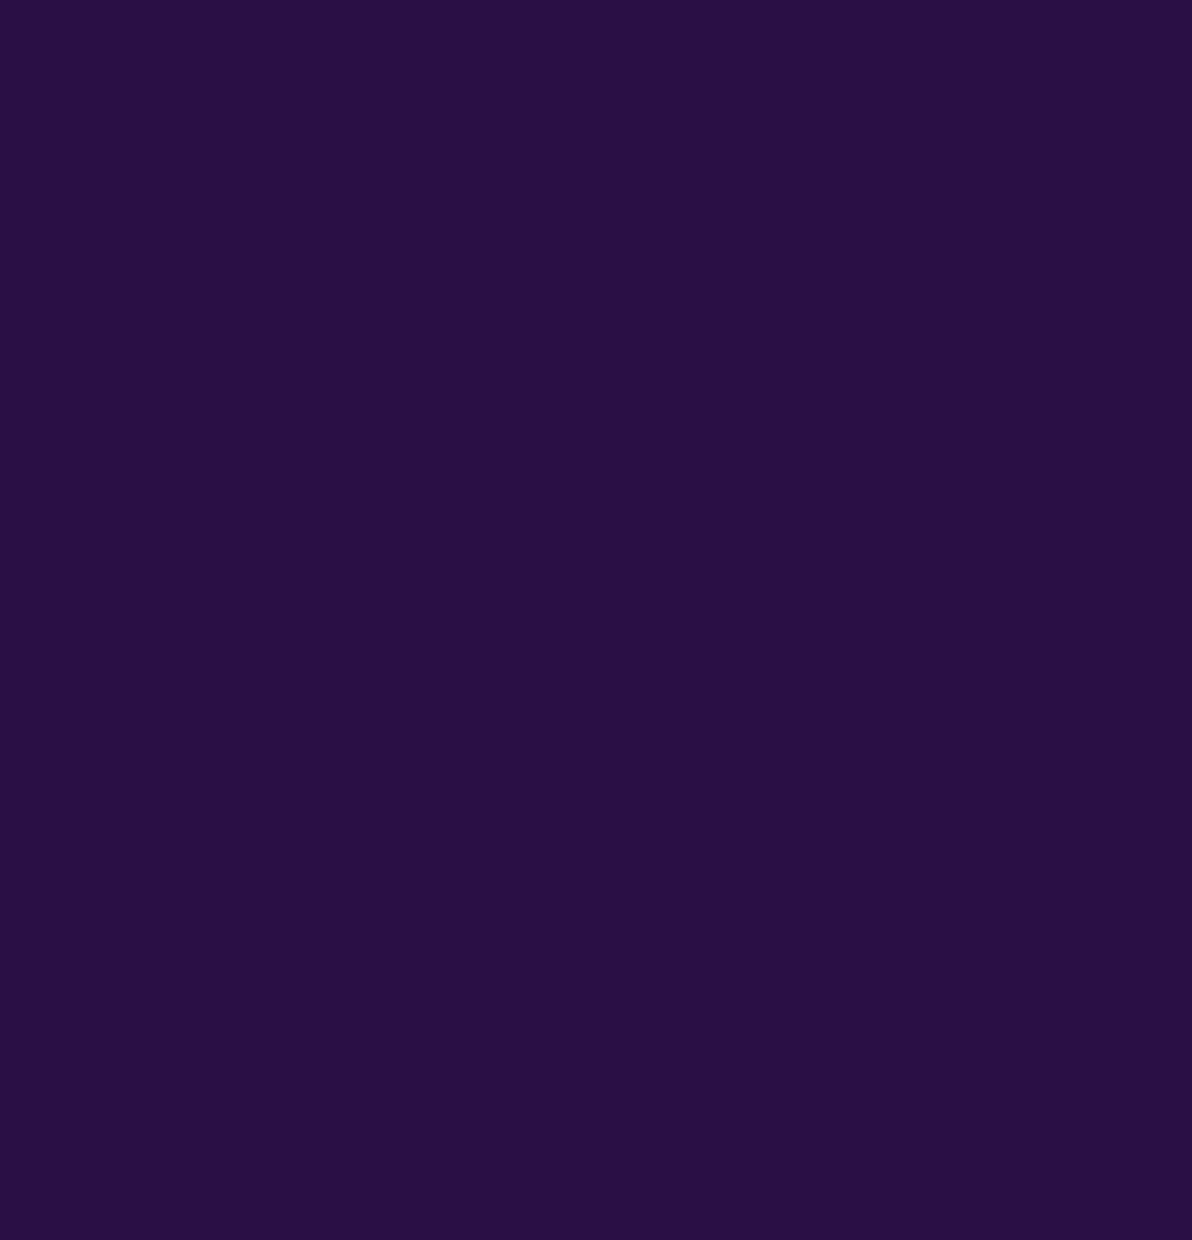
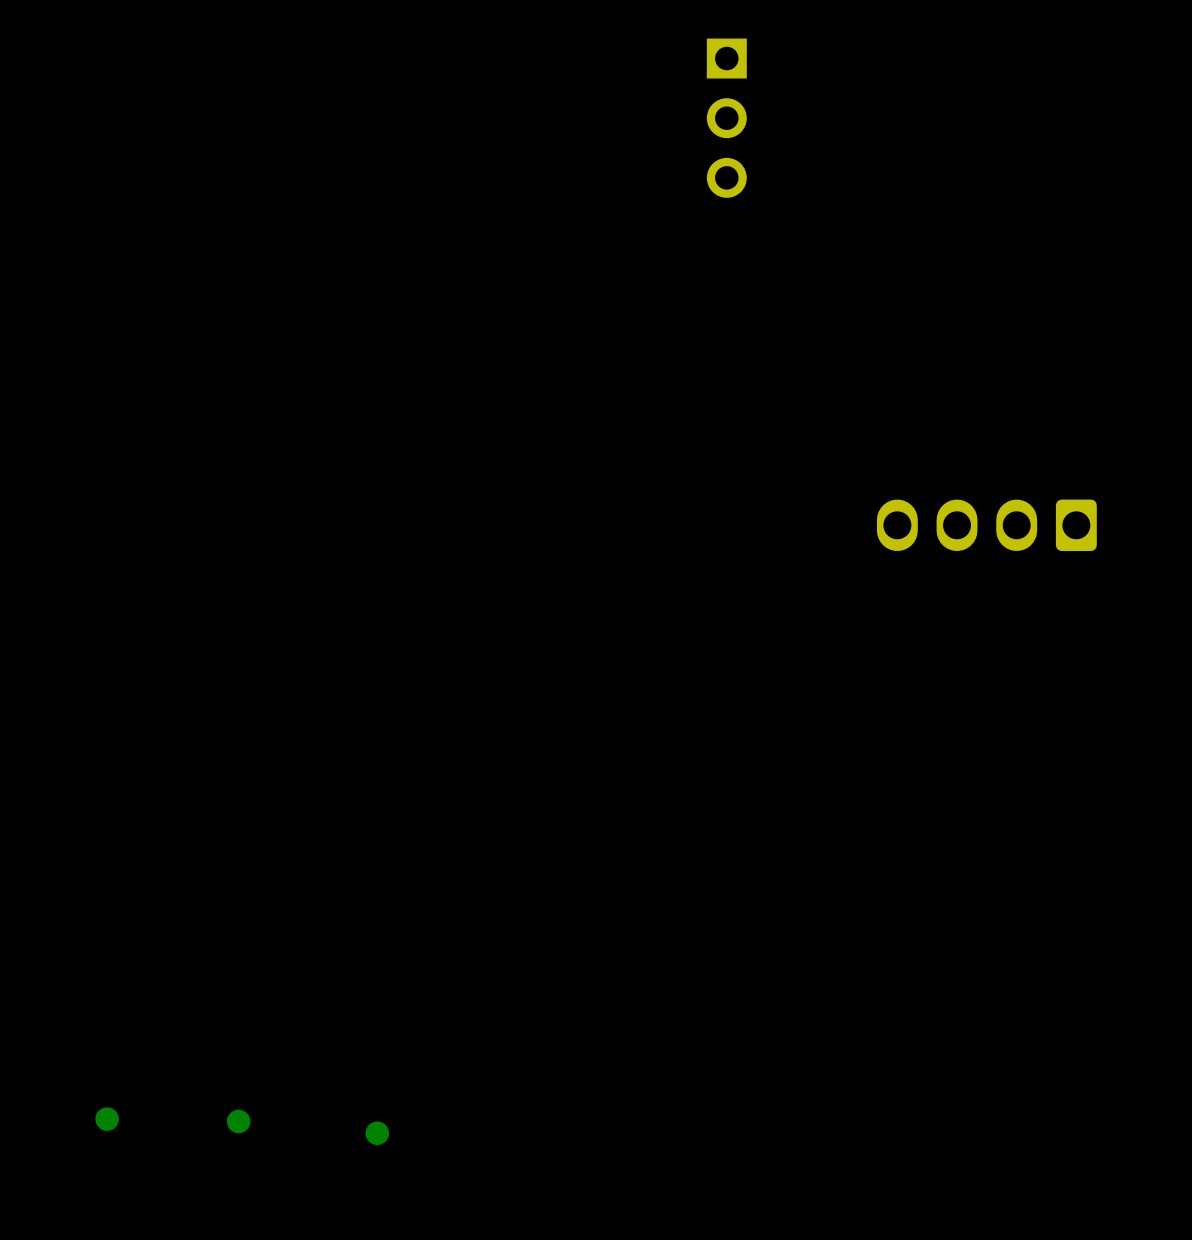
part: none -> (726, 118)
part: none -> (986, 525)
part: none -> (107, 1119)
part: none -> (238, 1121)
part: none -> (377, 1133)

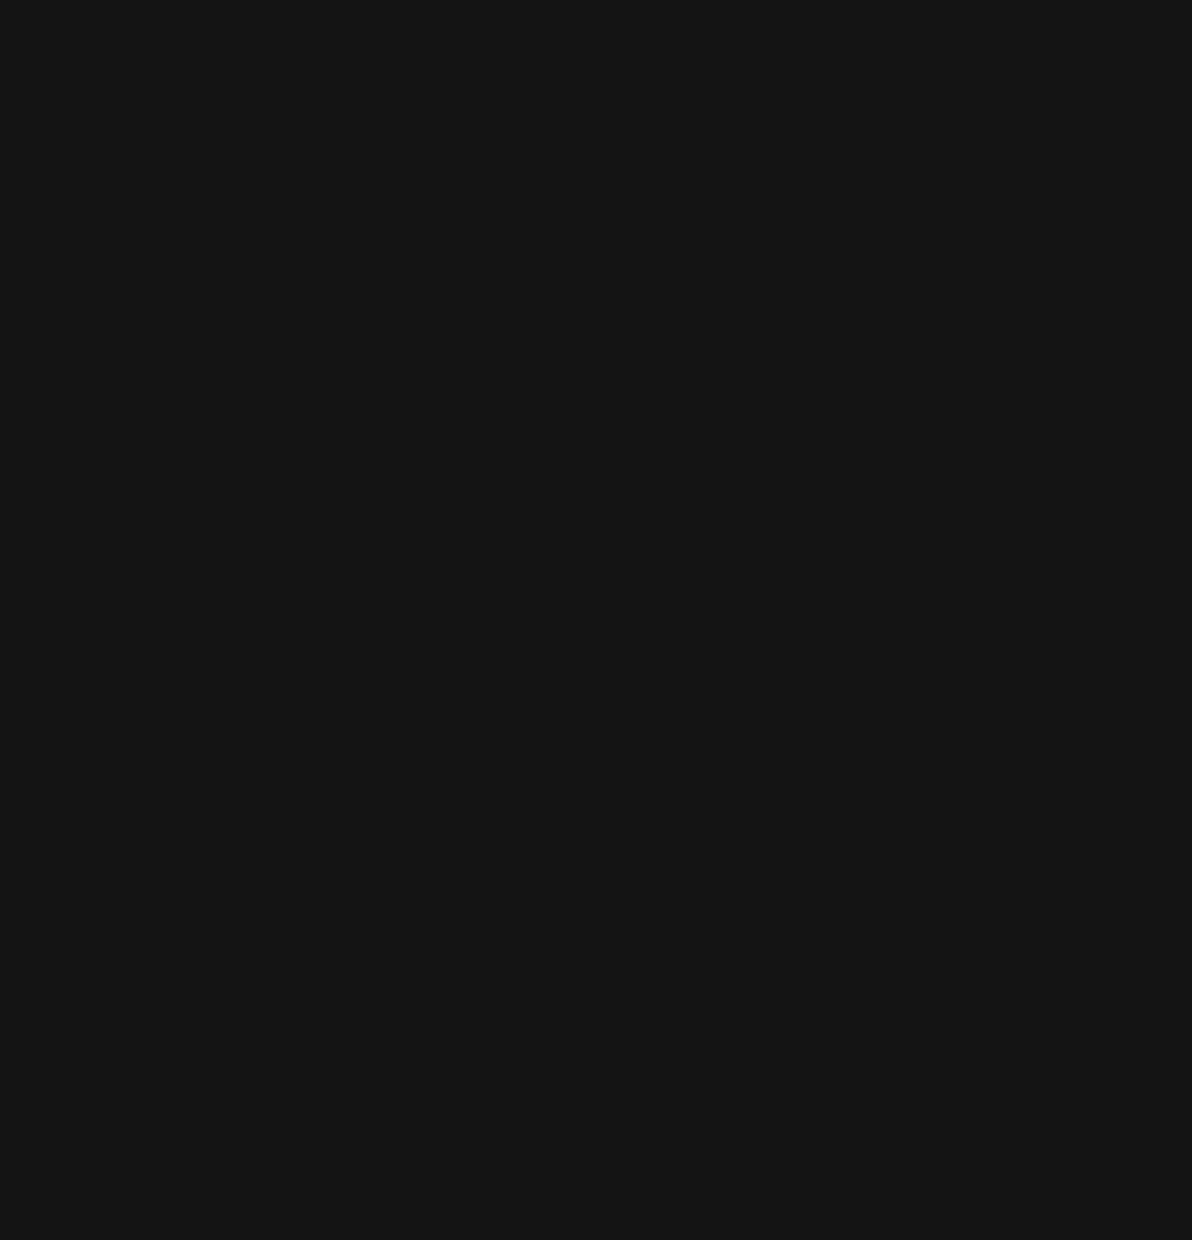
part: (726, 118) -> none
part: (986, 525) -> none
part: (107, 1119) -> none
part: (238, 1121) -> none
part: (377, 1133) -> none

